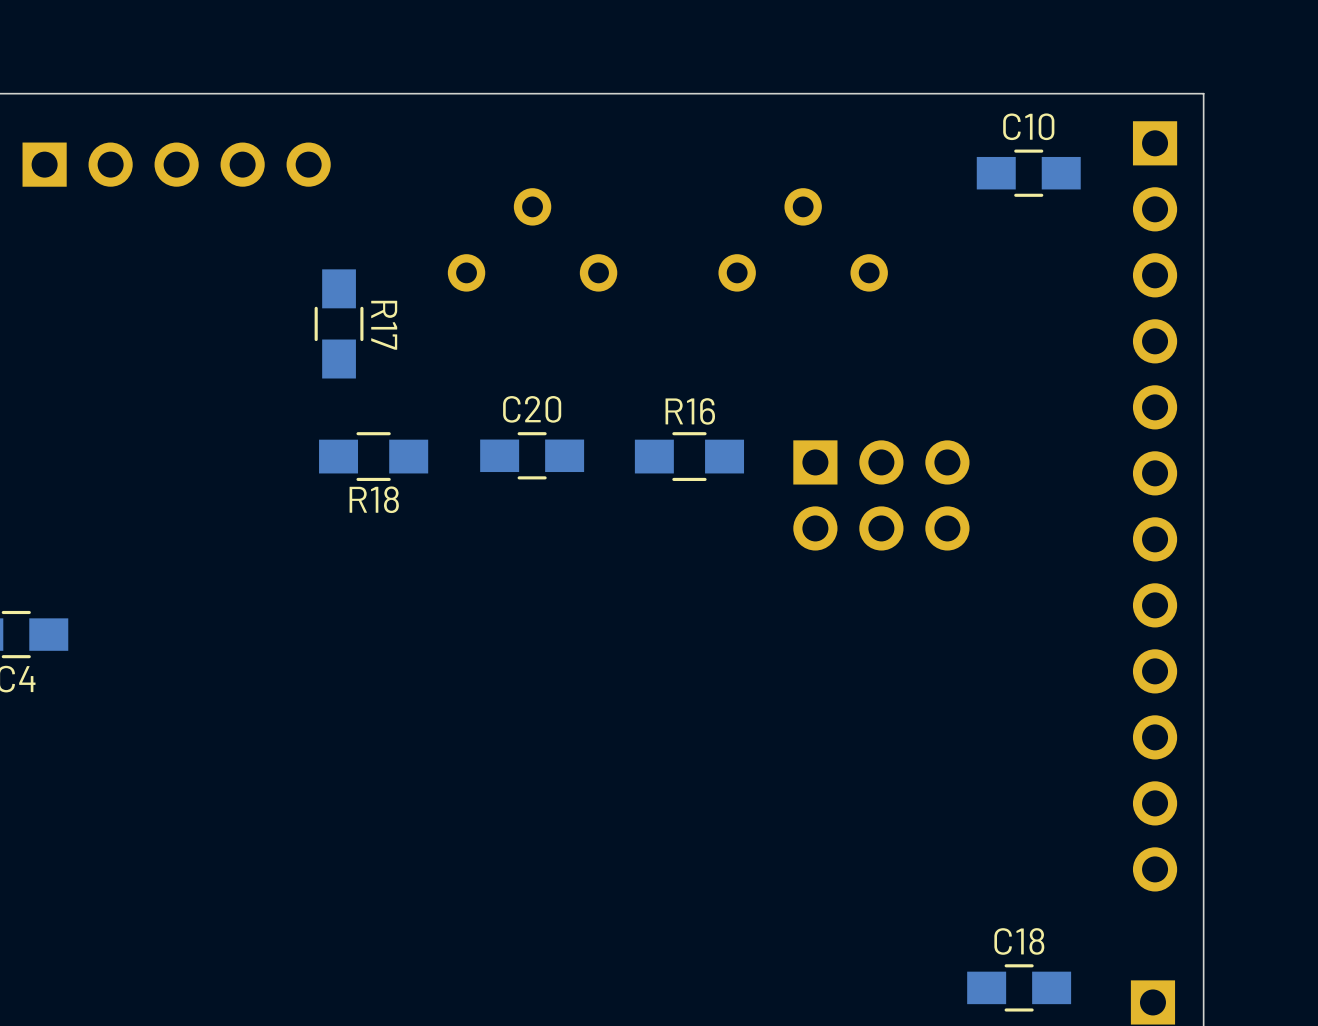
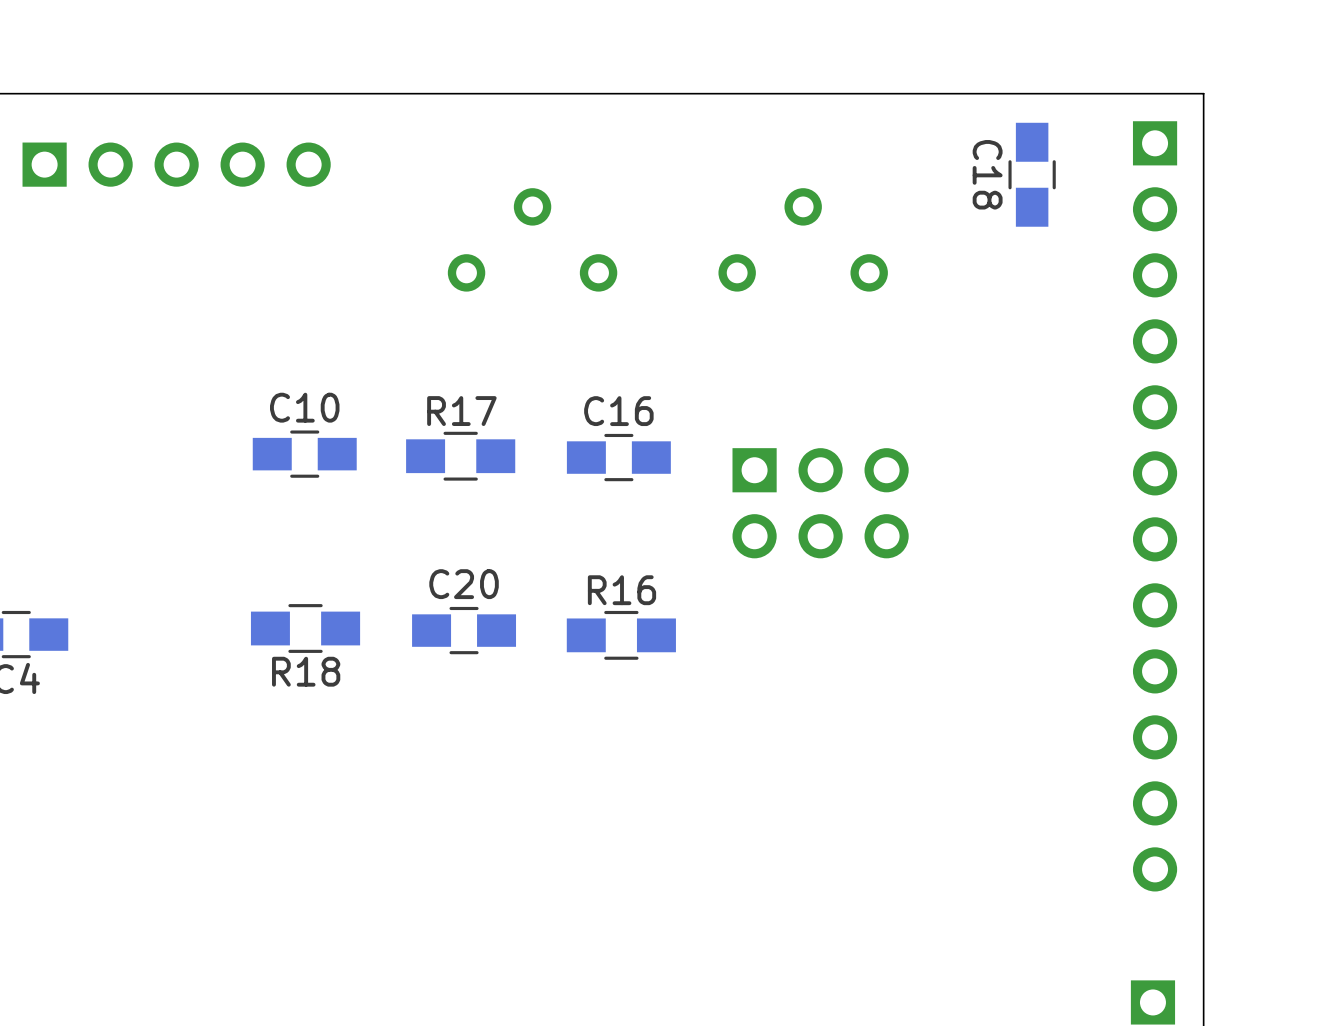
C10 position: (1028, 173) -> (304, 454)
R17 rotation: 0° (339, 323) -> 90° clockwise (460, 456)
R17 position: (339, 323) -> (460, 456)
R17 name position: R17 (384, 325) -> R17 (461, 411)
C20 position: (532, 455) -> (464, 630)
R18 position: (373, 456) -> (305, 628)
R16 position: (689, 456) -> (621, 635)
C16: none -> (618, 457)
part position: (881, 495) -> (820, 503)
C18 name position: C18 (1019, 941) -> C18 (987, 174)
C18 rotation: 0° (1019, 987) -> 90° clockwise (1032, 174)
C18 position: (1019, 987) -> (1032, 174)

